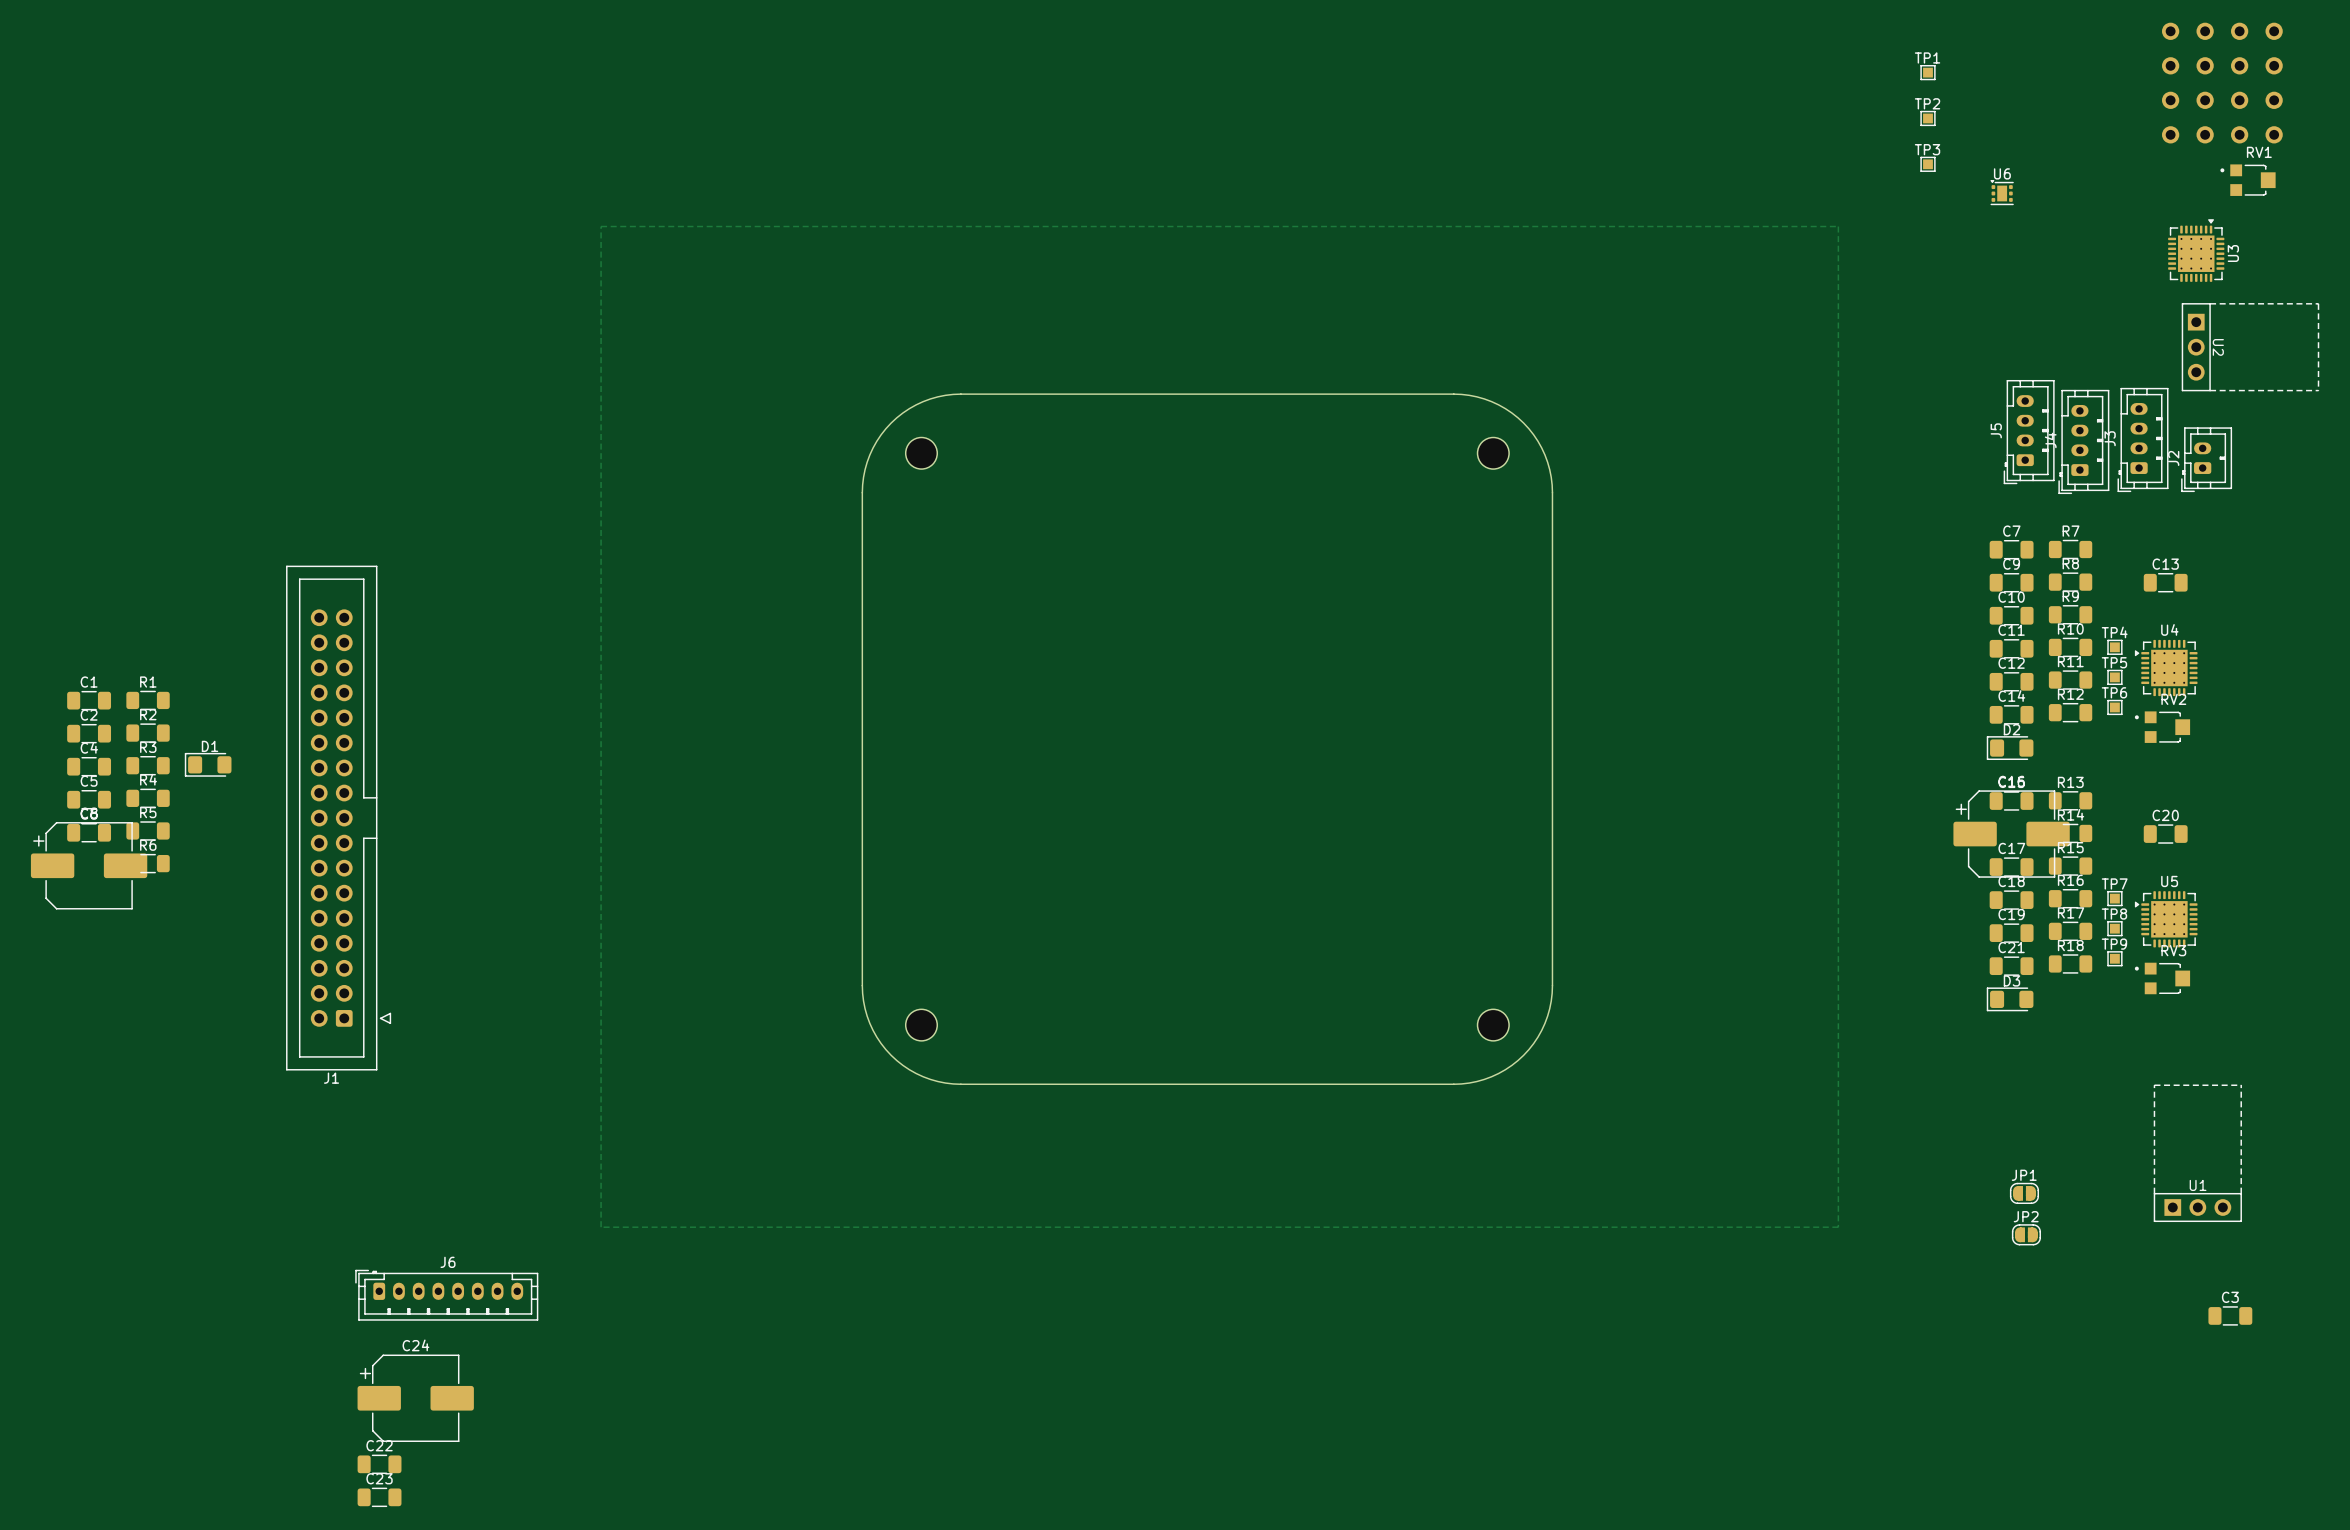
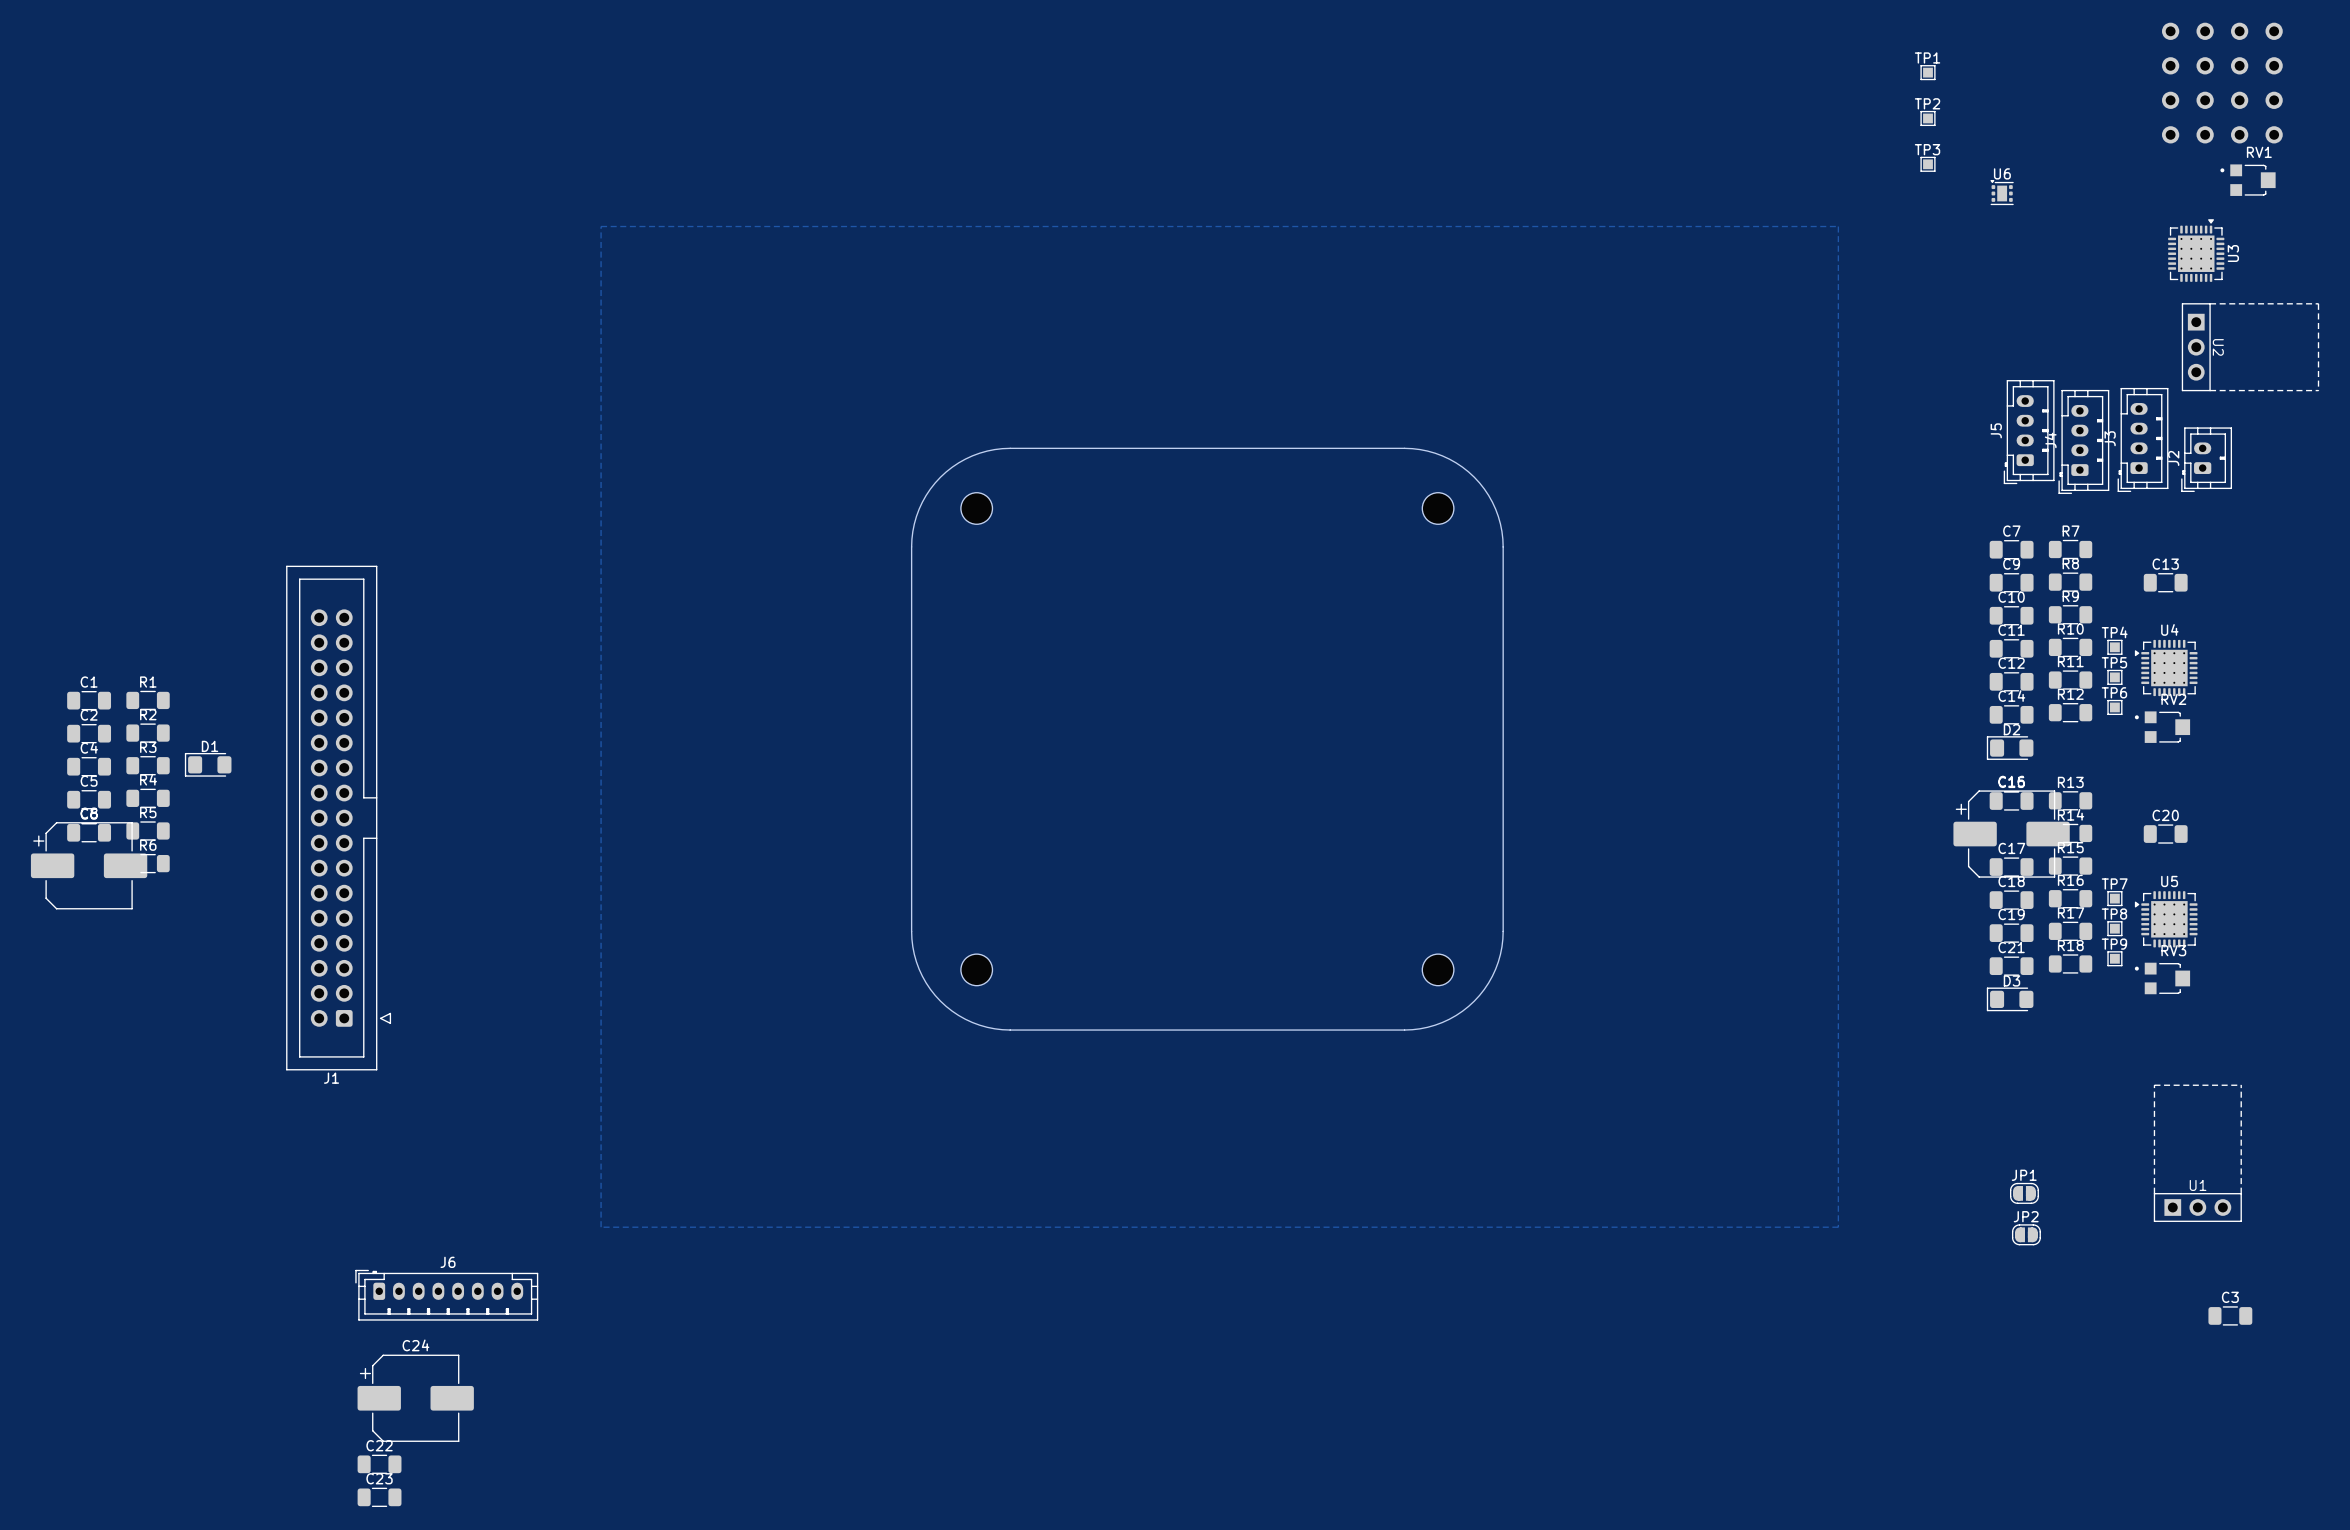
board edge: (960, 394) (1461, 394) (1476, 396) (1498, 404) (1517, 417) (1528, 428) (1544, 454) (1552, 484) (1552, 985) (1551, 1001) (1544, 1023) (1533, 1043) (1517, 1060) (1491, 1076) (1461, 1083) (960, 1084) (937, 1081) (916, 1073) (902, 1065) (885, 1049) (869, 1023) (862, 993) (862, 484) (865, 469) (873, 447) (881, 434) (896, 417) (916, 404) (930, 398) (960, 394) -> (1010, 448) (979, 453) (965, 459) (946, 471) (930, 488) (922, 502) (912, 531) (911, 939) (919, 969) (935, 995) (952, 1011) (972, 1022) (987, 1027) (1010, 1030) (1412, 1029) (1442, 1022) (1468, 1006) (1479, 995) (1492, 976) (1500, 954) (1503, 931) (1502, 539) (1495, 509) (1479, 482) (1468, 471) (1449, 459) (1435, 453) (1412, 448) (1010, 448)
part position: (921, 453) -> (976, 508)
part position: (1493, 453) -> (1438, 508)
part position: (921, 1025) -> (976, 969)
part position: (1493, 1025) -> (1438, 969)

